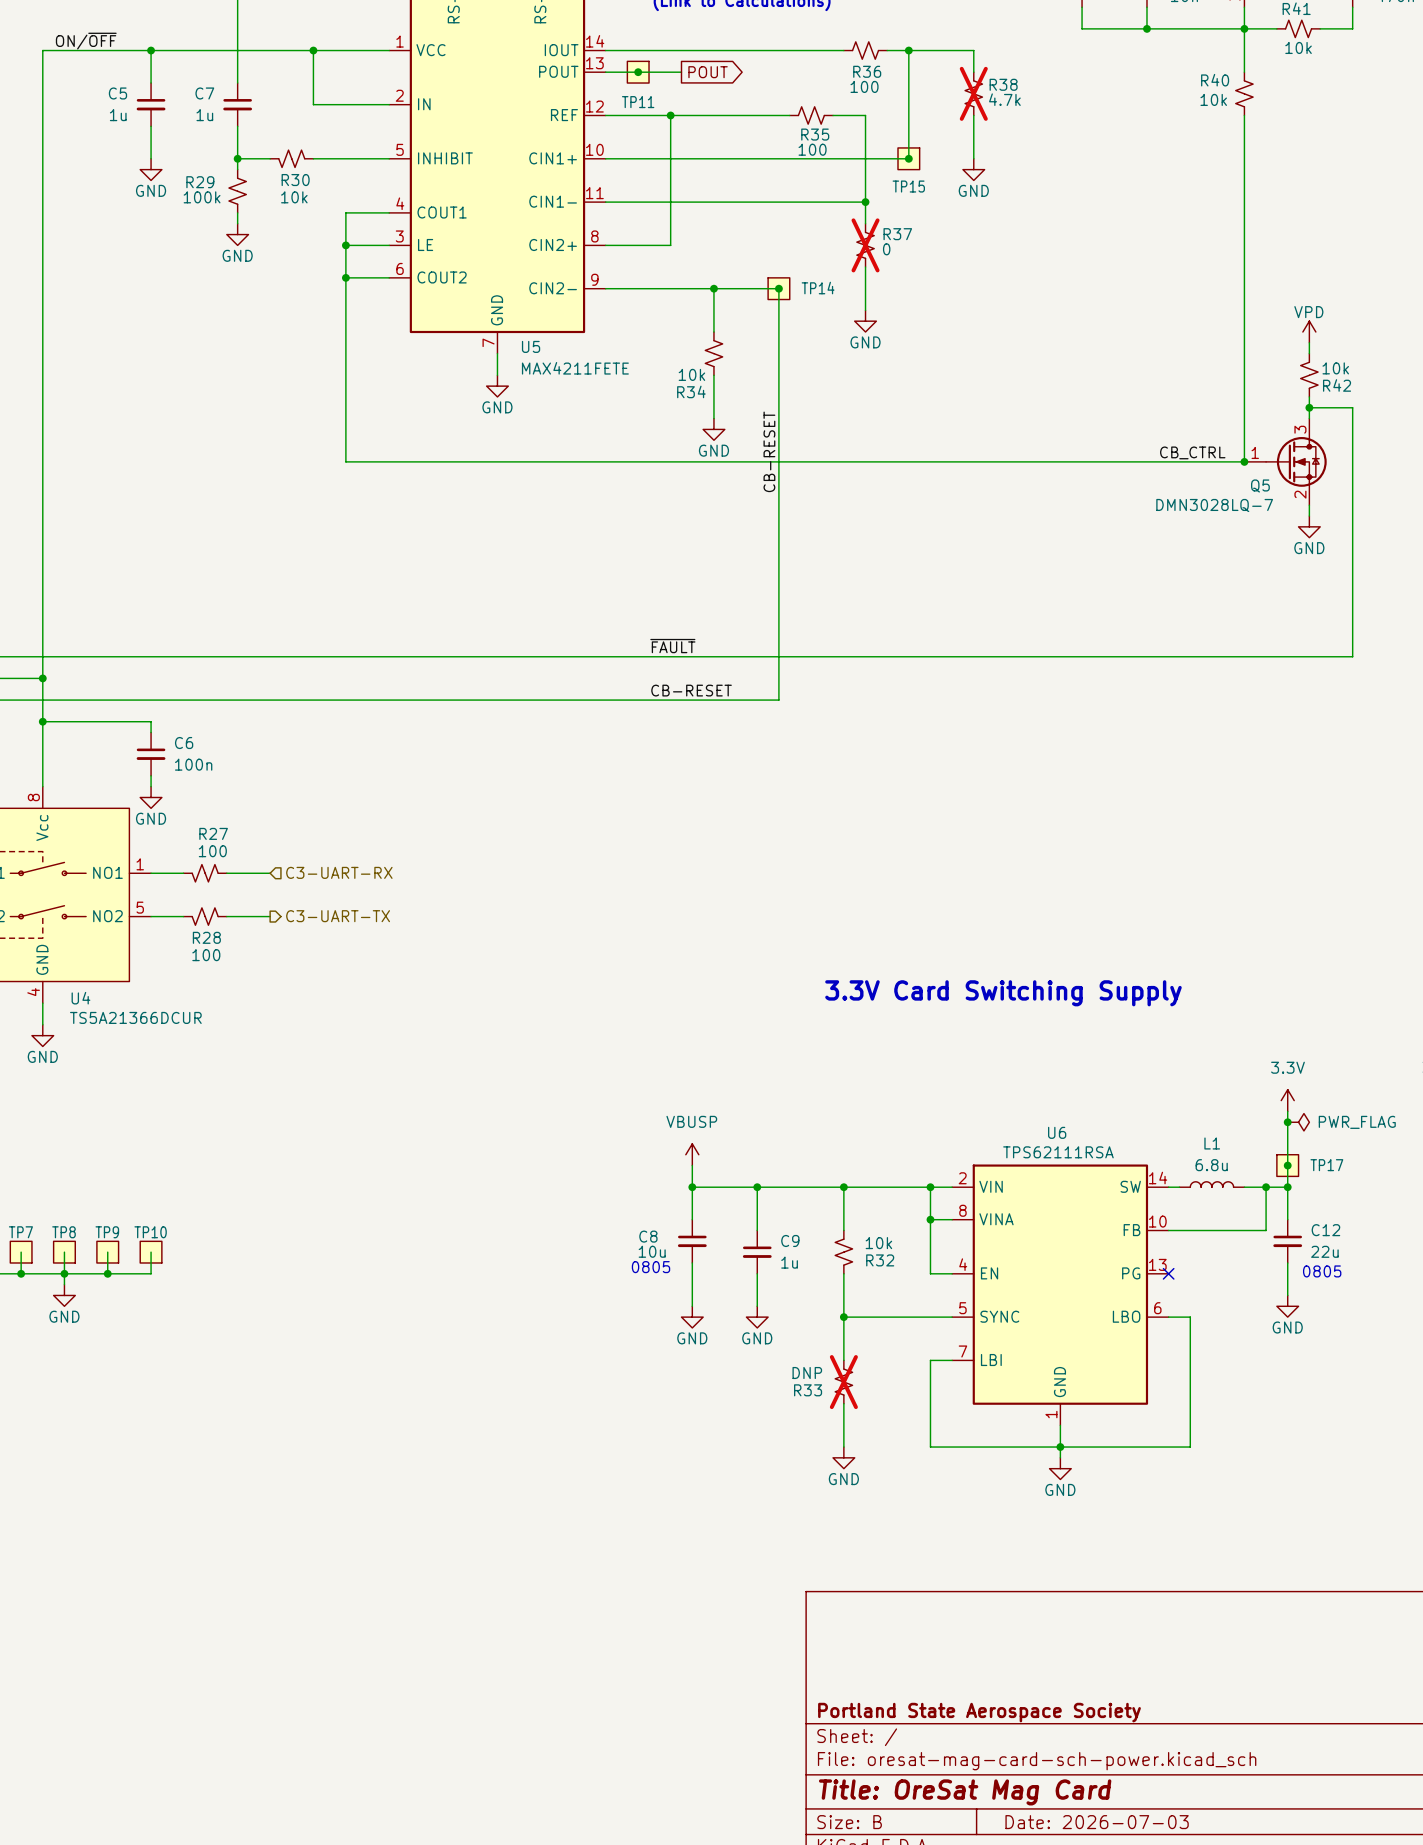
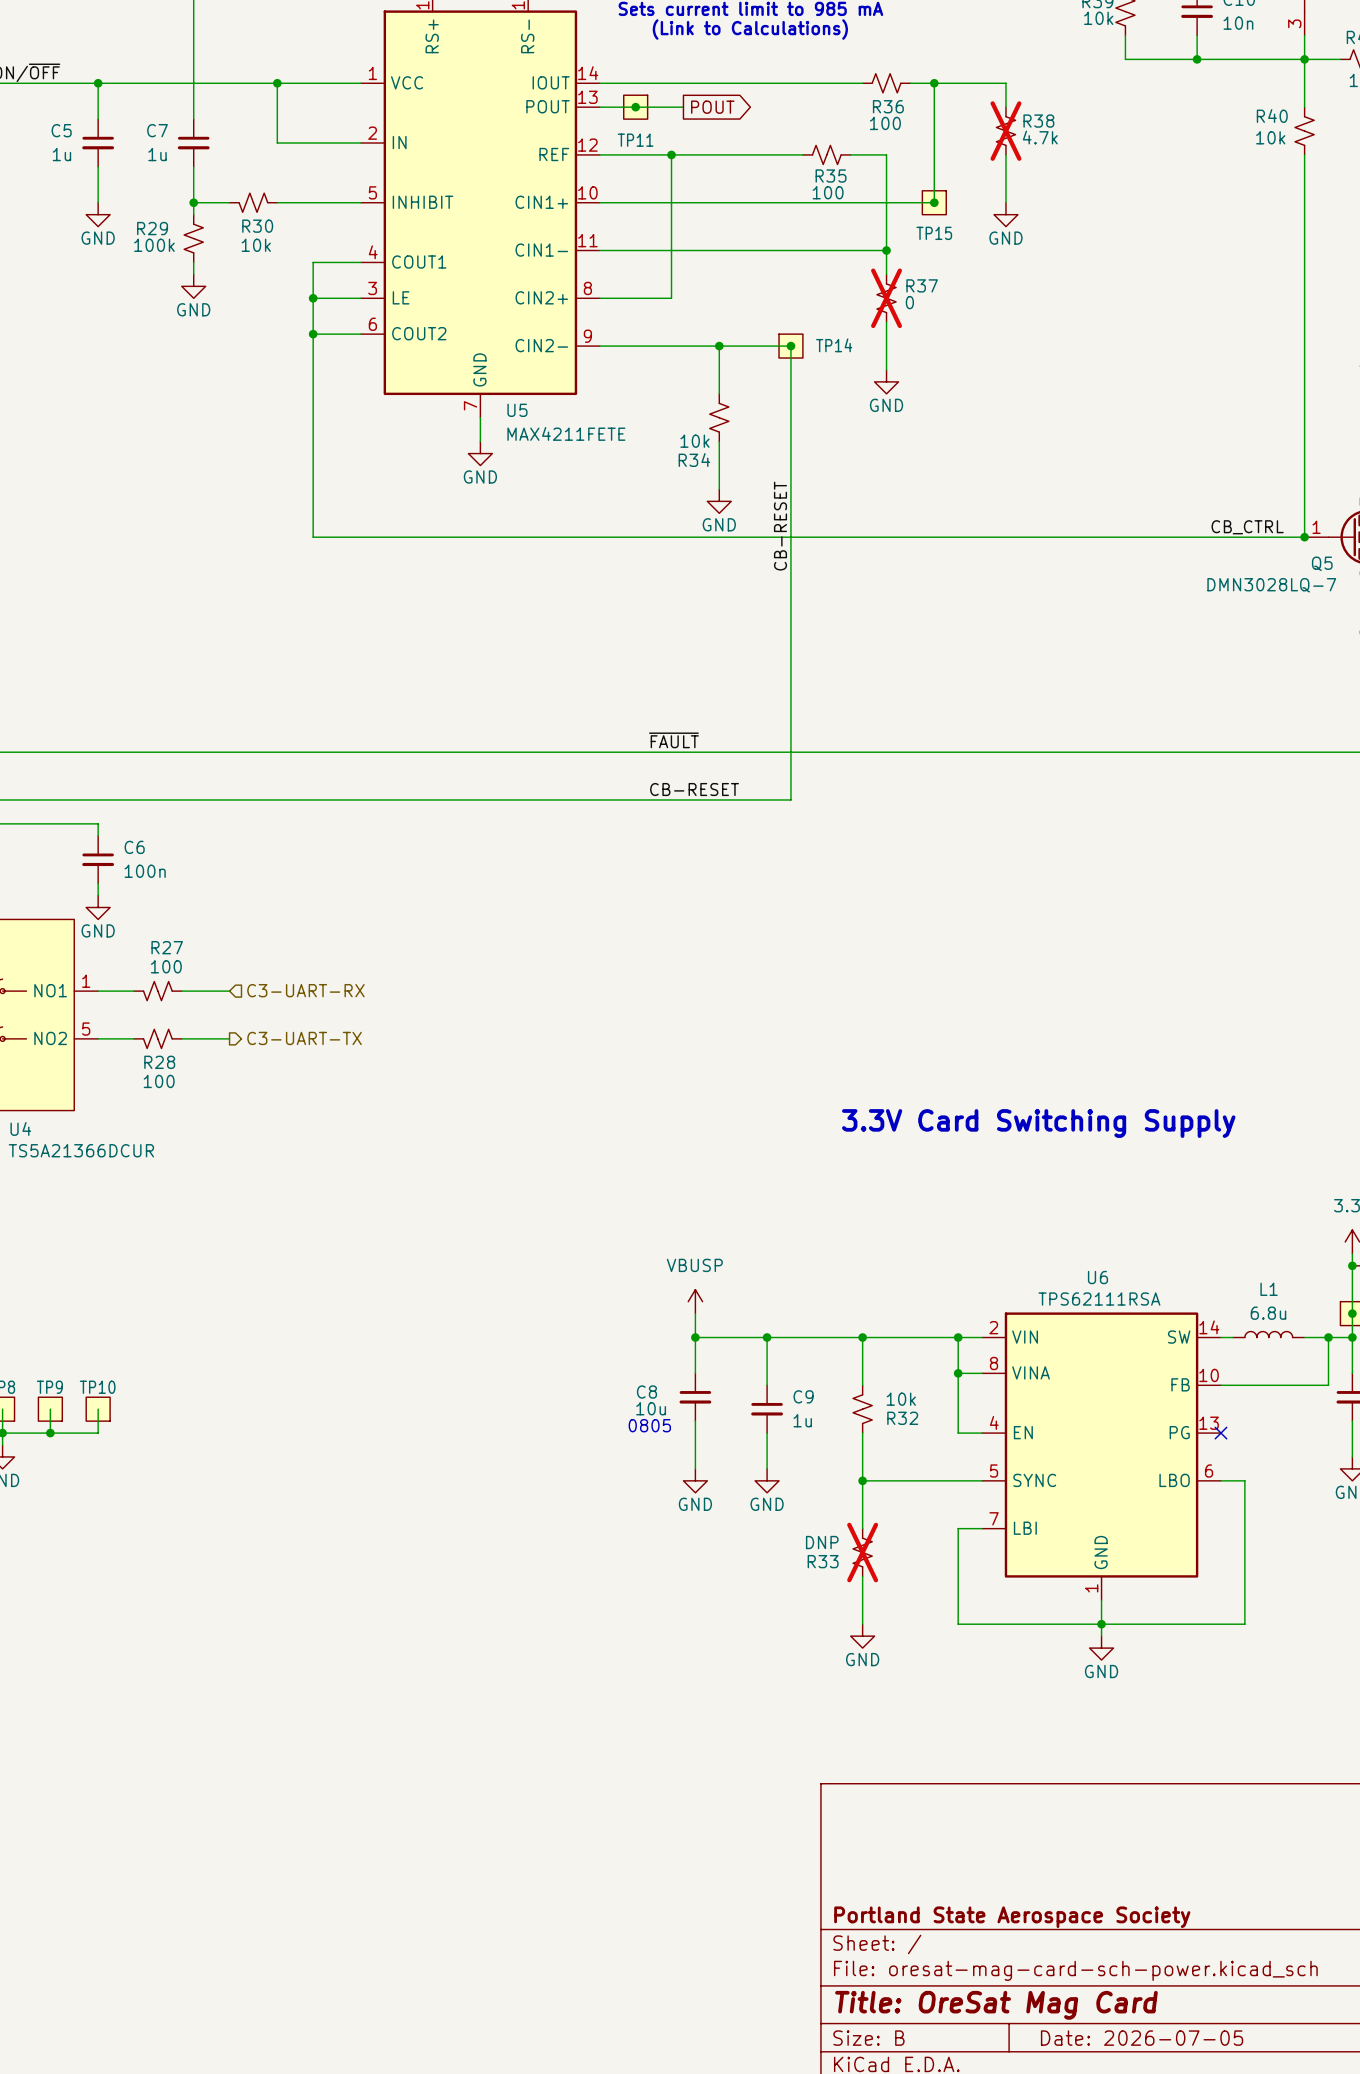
title block: Date: 2026-07-03 (1097, 1822) -> Date: 2026-07-05 (1142, 2038)

